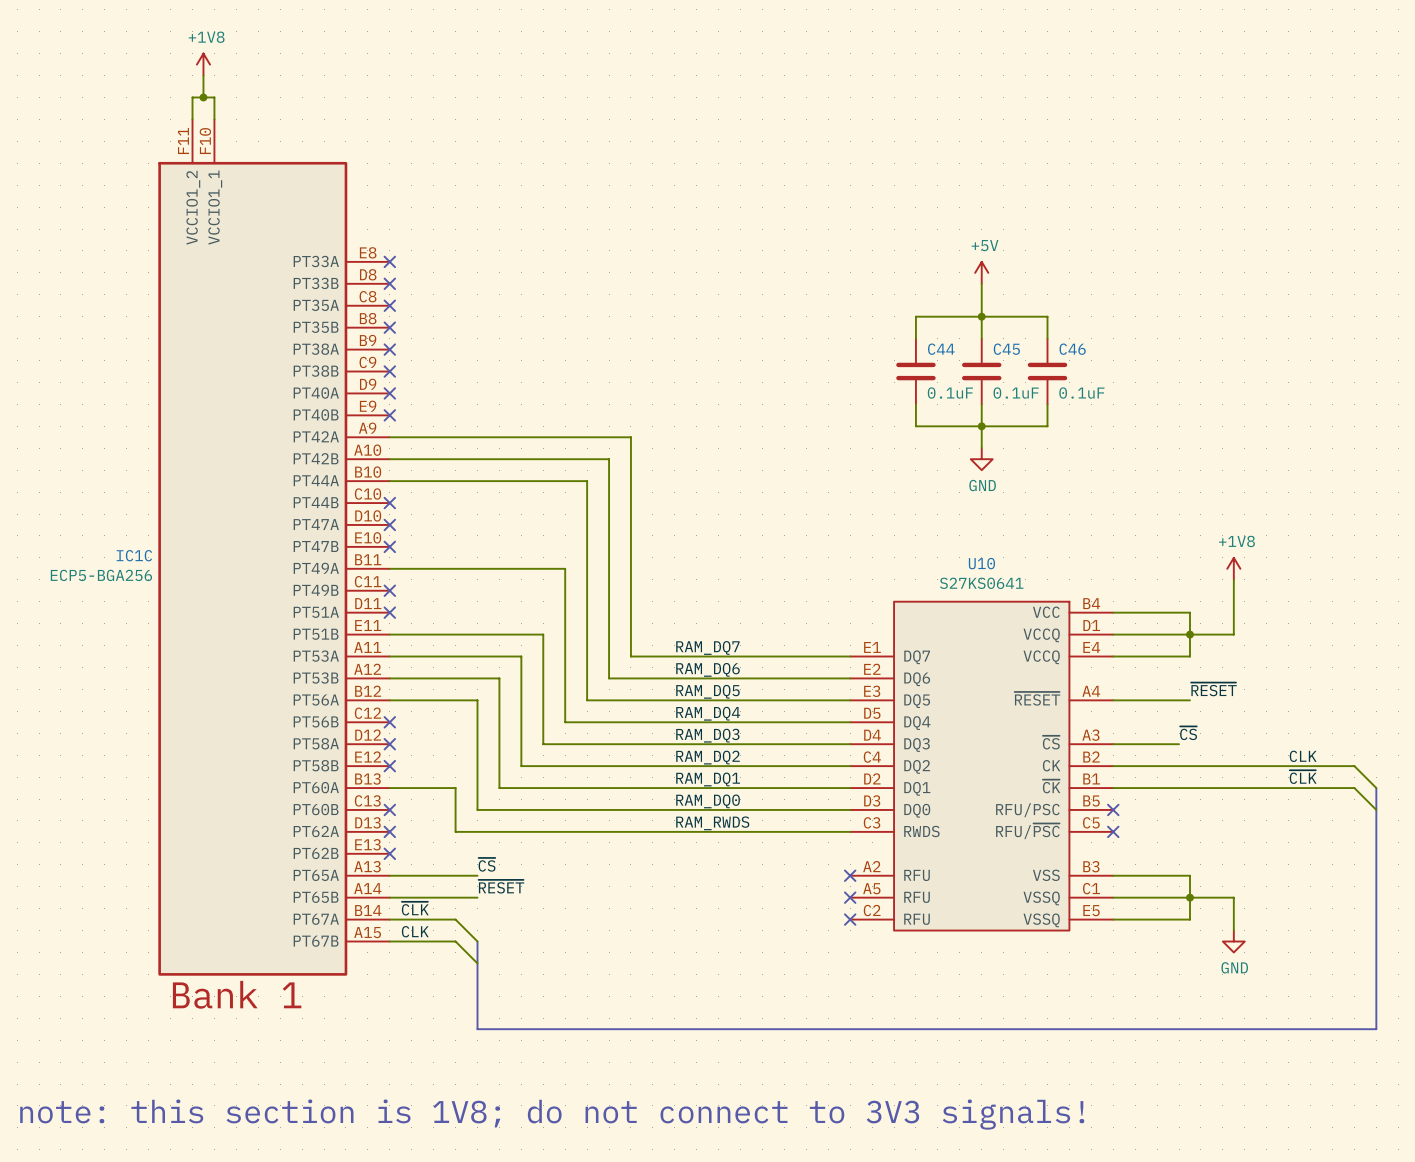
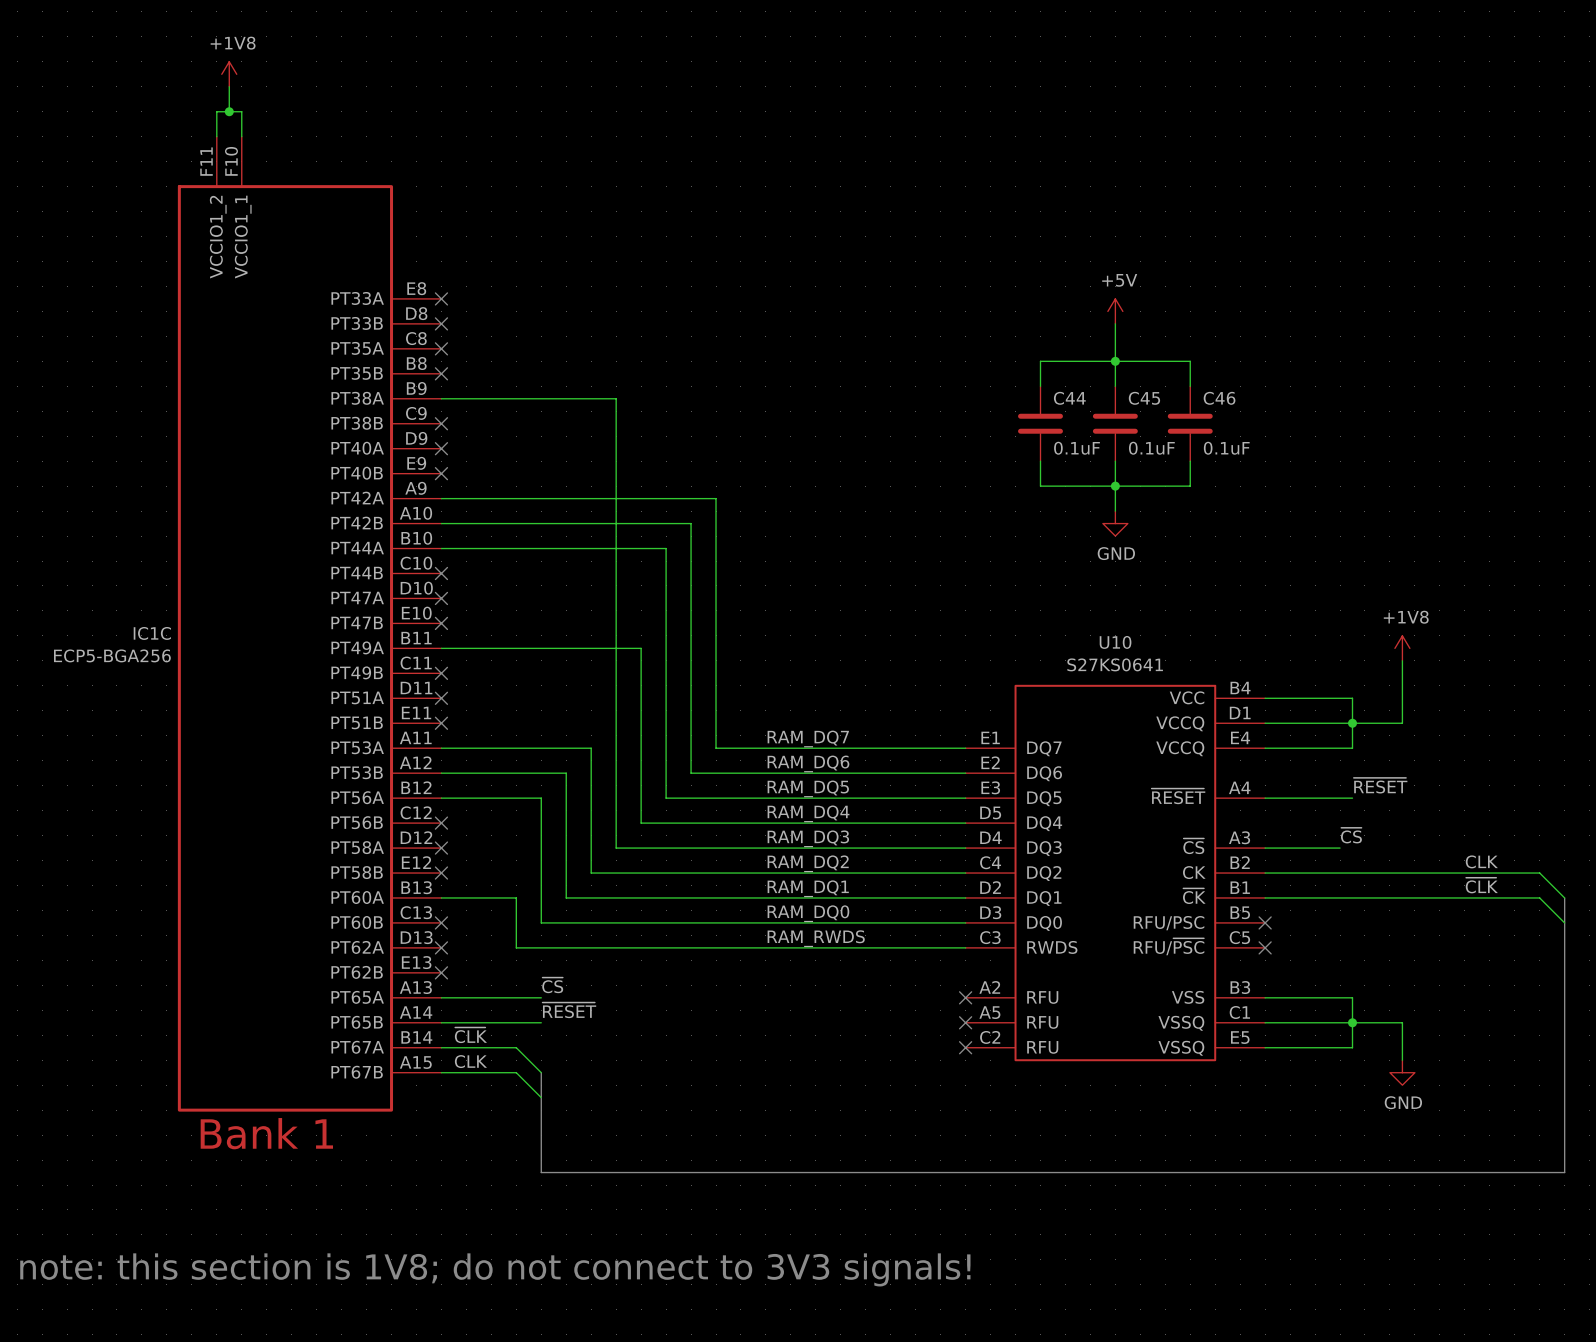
no-connect mark: (389, 349) -> none
wire: (389, 634) (543, 634) -> (441, 398) (616, 398) (616, 723)
no-connect mark: none -> (441, 723)

